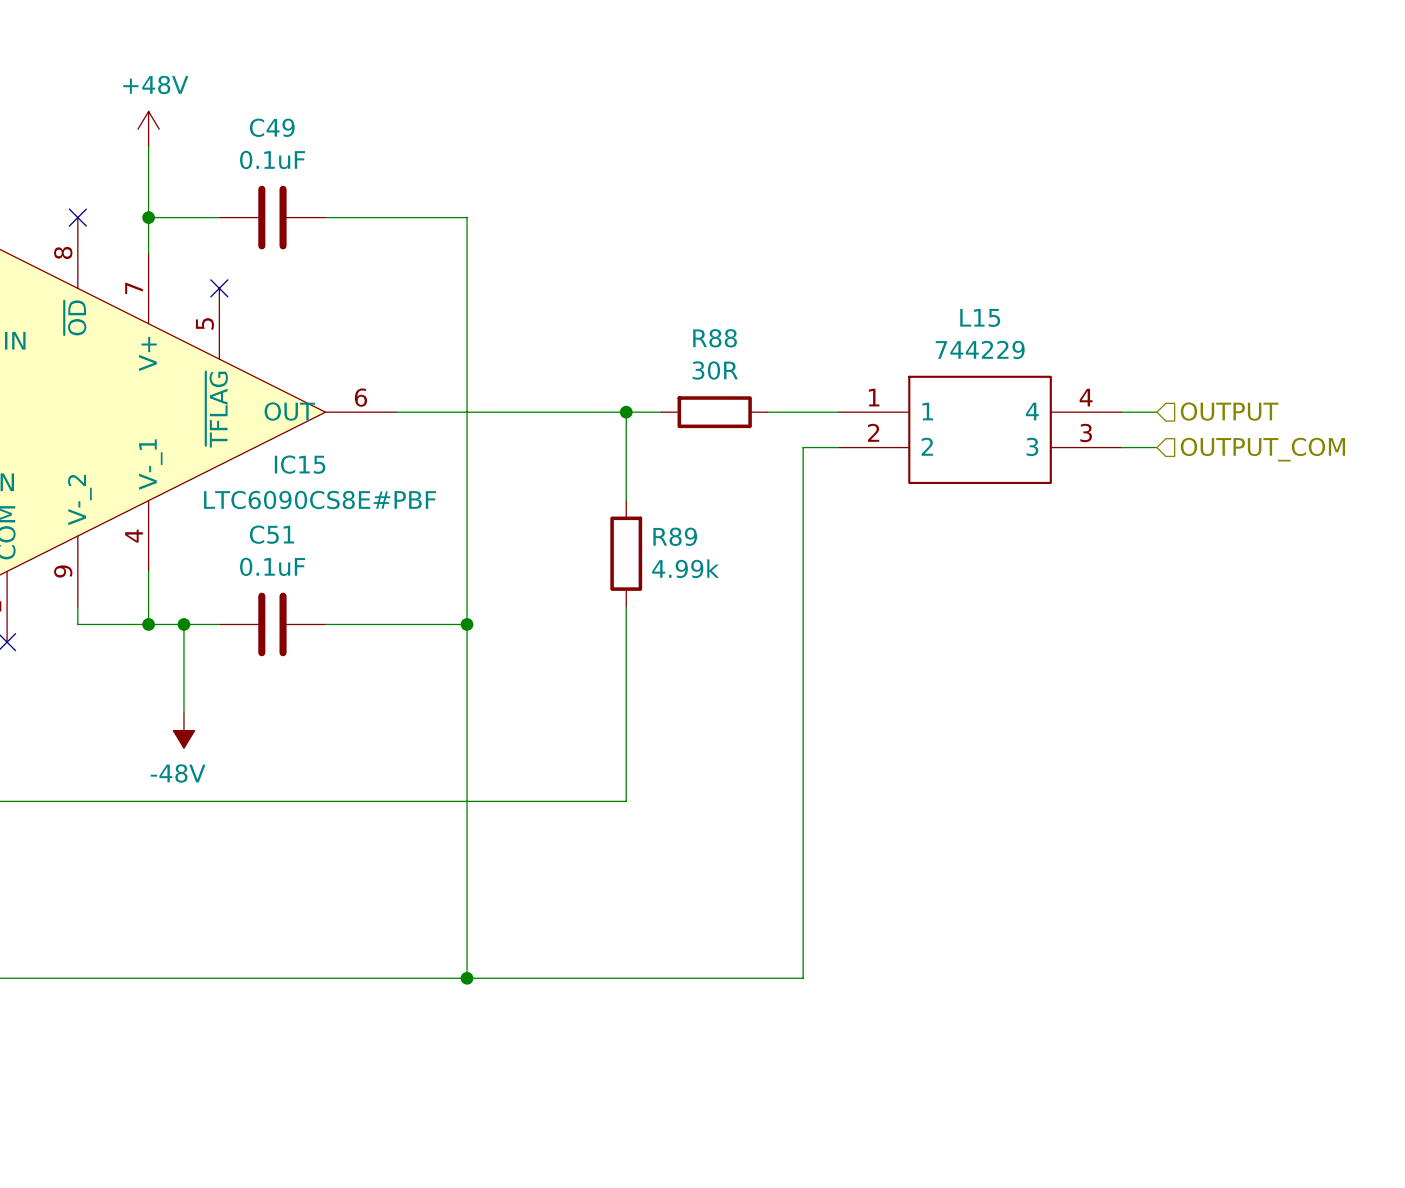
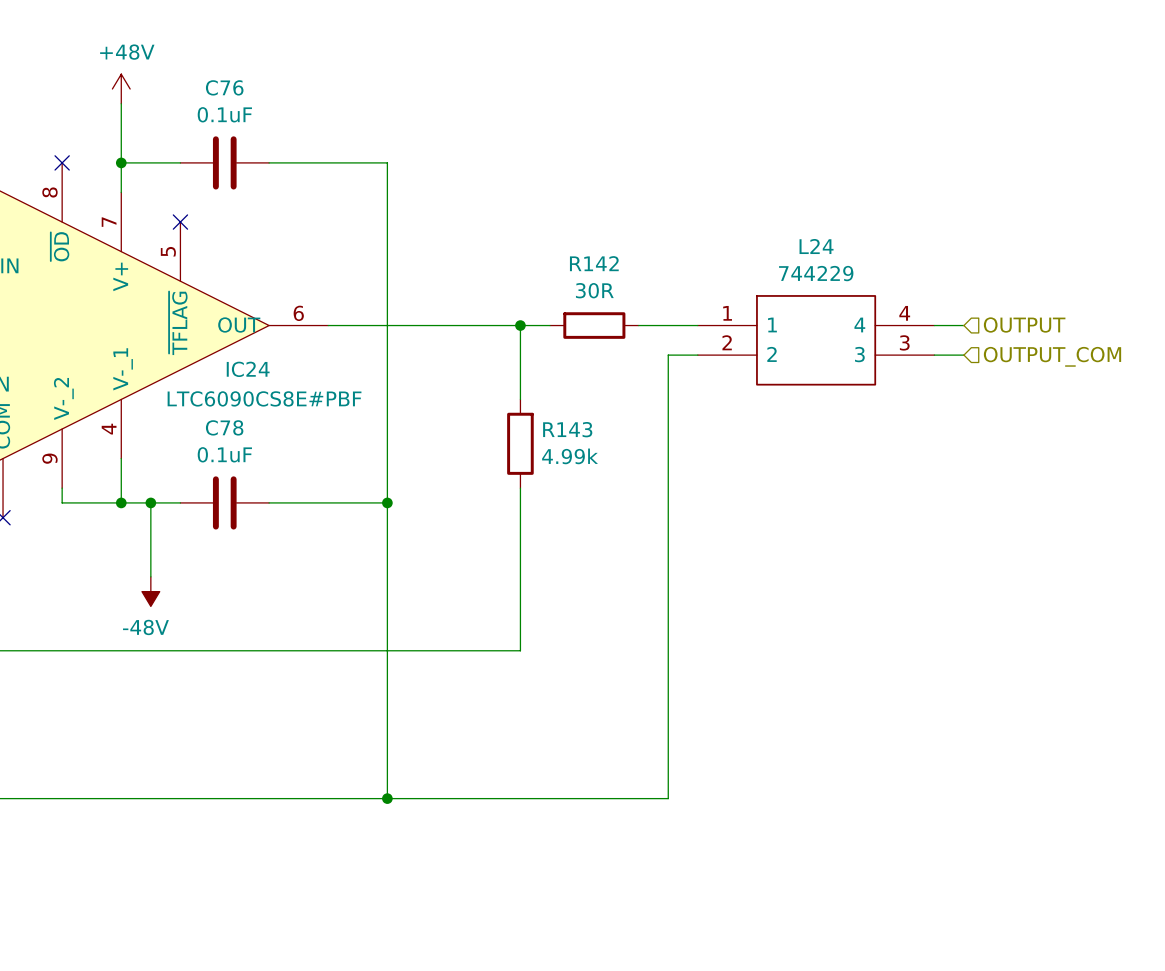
C49 name: C49 (272, 127) -> C76 (224, 87)
L15 name: L15 (980, 317) -> L24 (816, 246)
R88 name: R88 (715, 338) -> R142 (594, 263)
IC15 name: IC15 (300, 464) -> IC24 (248, 369)
C51 name: C51 (271, 534) -> C78 (224, 427)
R89 name: R89 (675, 536) -> R143 (567, 429)

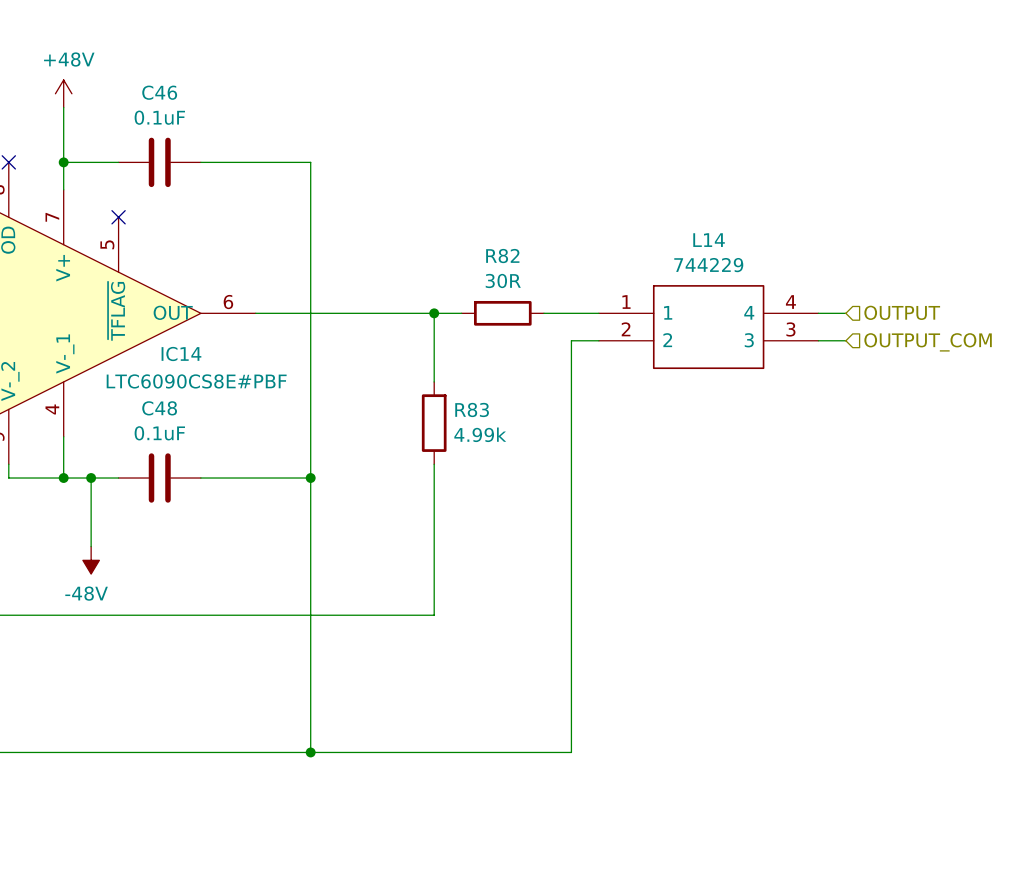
C76 name: C76 (224, 87) -> C46 (159, 92)
L24 name: L24 (816, 246) -> L14 (709, 240)
R142 name: R142 (594, 263) -> R82 (502, 256)
IC24 name: IC24 (248, 369) -> IC14 (181, 354)
C78 name: C78 (224, 427) -> C48 (159, 408)
R143 name: R143 (567, 429) -> R83 (472, 409)

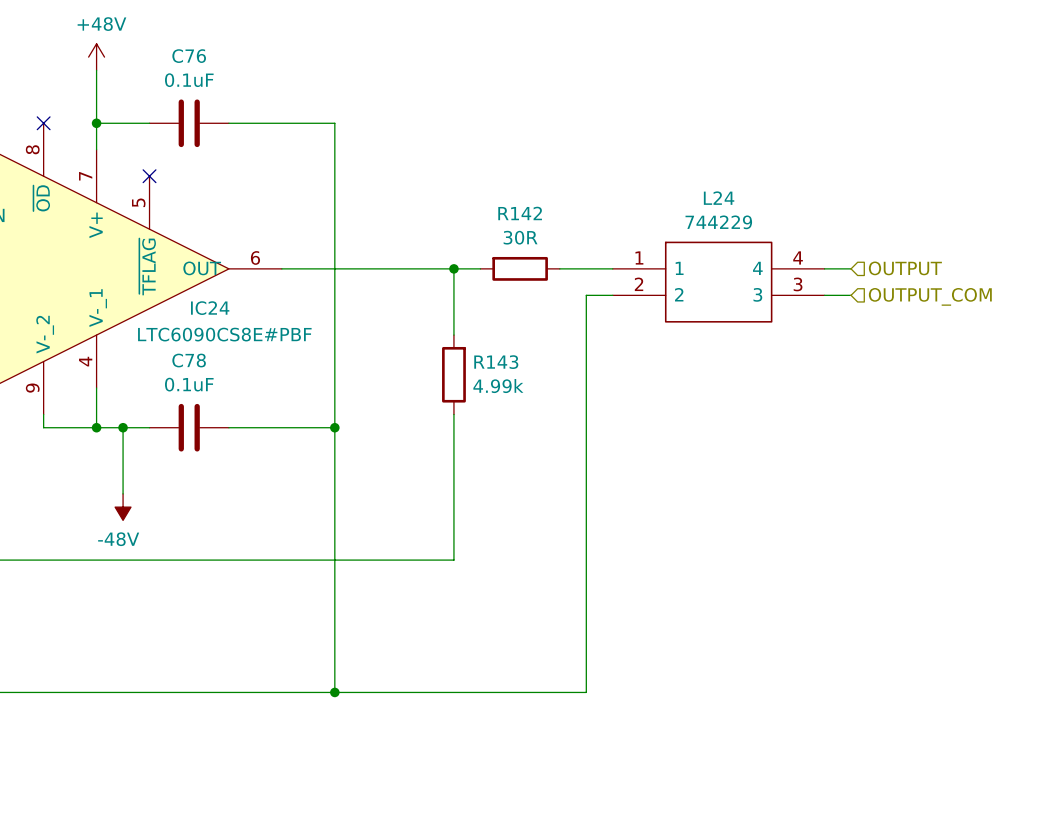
C46 name: C46 (159, 92) -> C76 (189, 56)
L14 name: L14 (709, 240) -> L24 (719, 198)
R82 name: R82 (502, 256) -> R142 (520, 213)
IC14 name: IC14 (181, 354) -> IC24 (210, 308)
C48 name: C48 (159, 408) -> C78 (189, 360)
R83 name: R83 (472, 409) -> R143 (496, 362)

